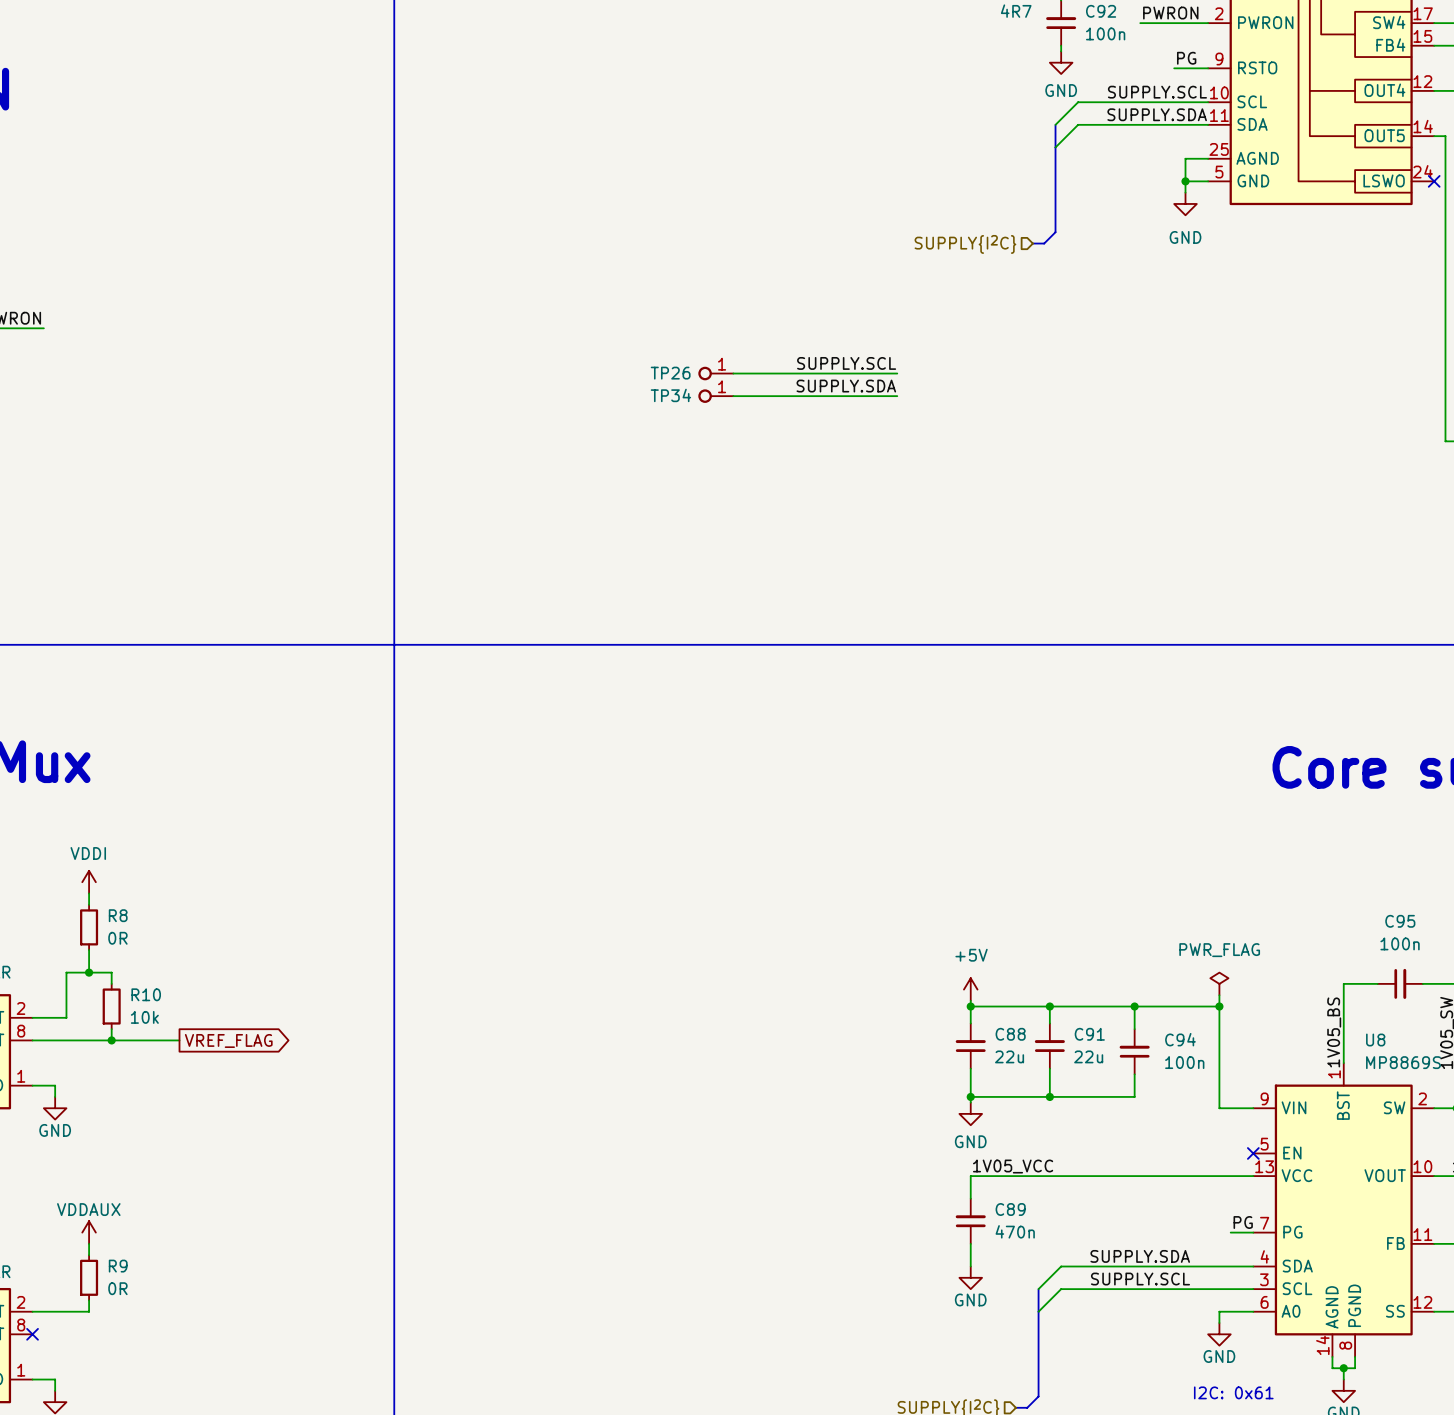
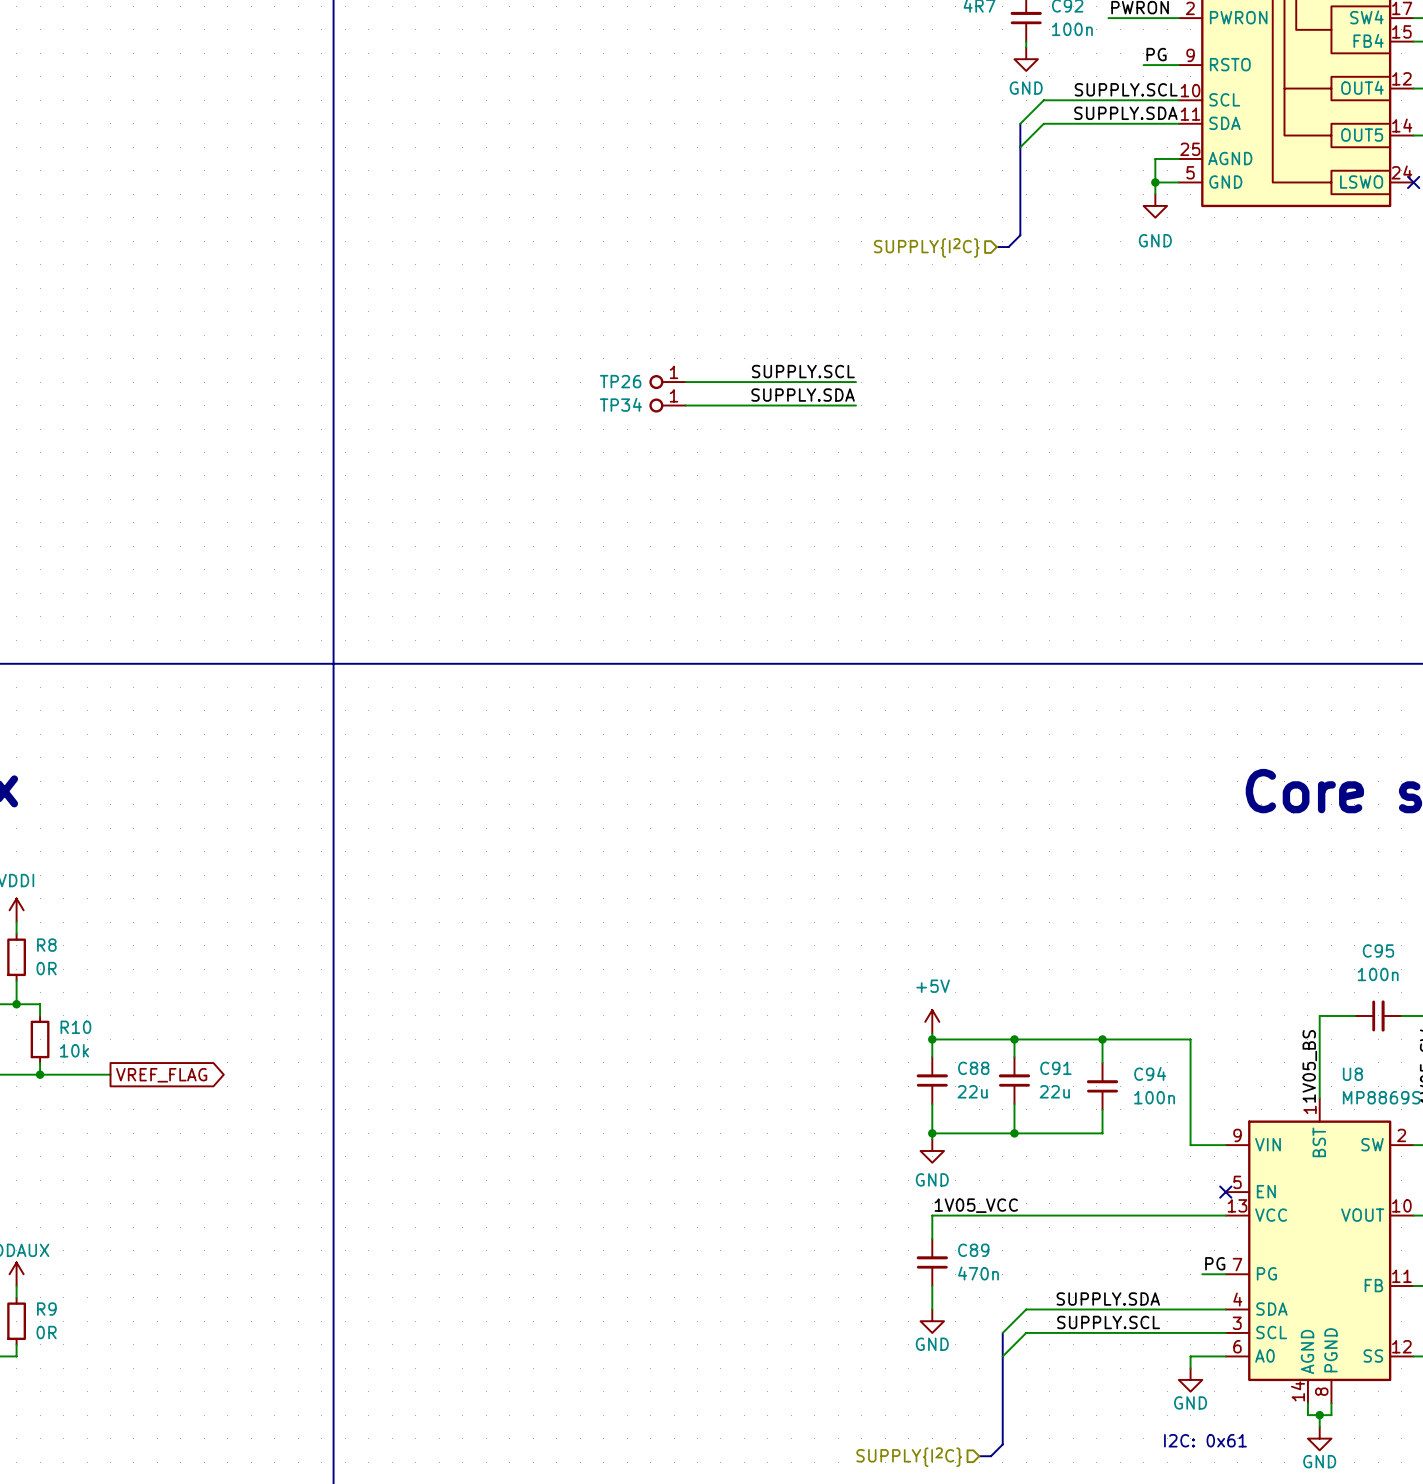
power symbol: PWR_FLAG (1219, 983) -> none
wire: (1219, 995) (1219, 1006) -> none
junction: (1219, 1006) -> none

